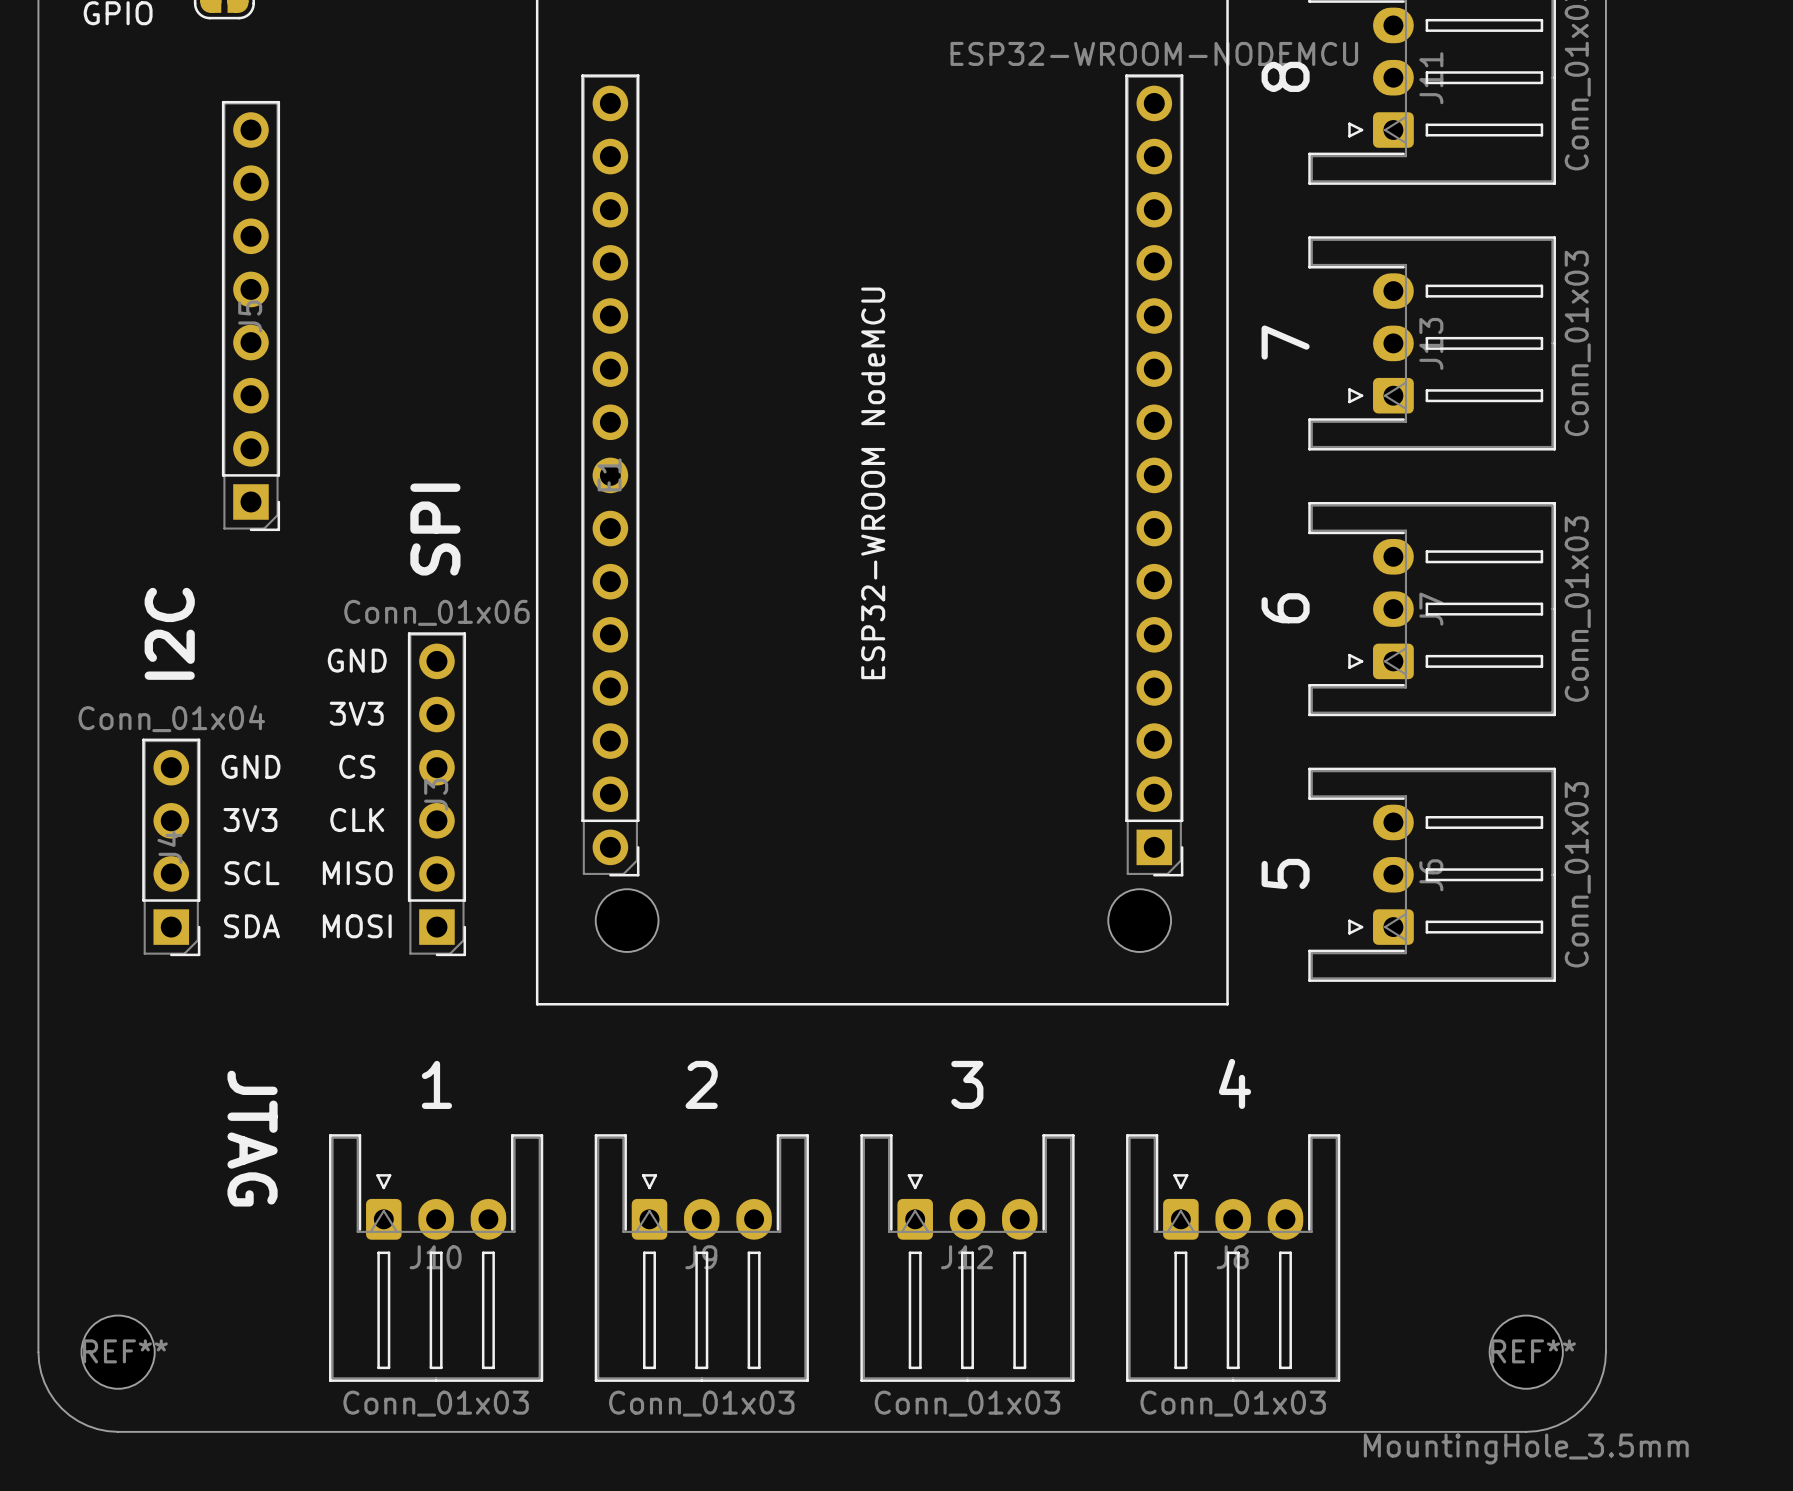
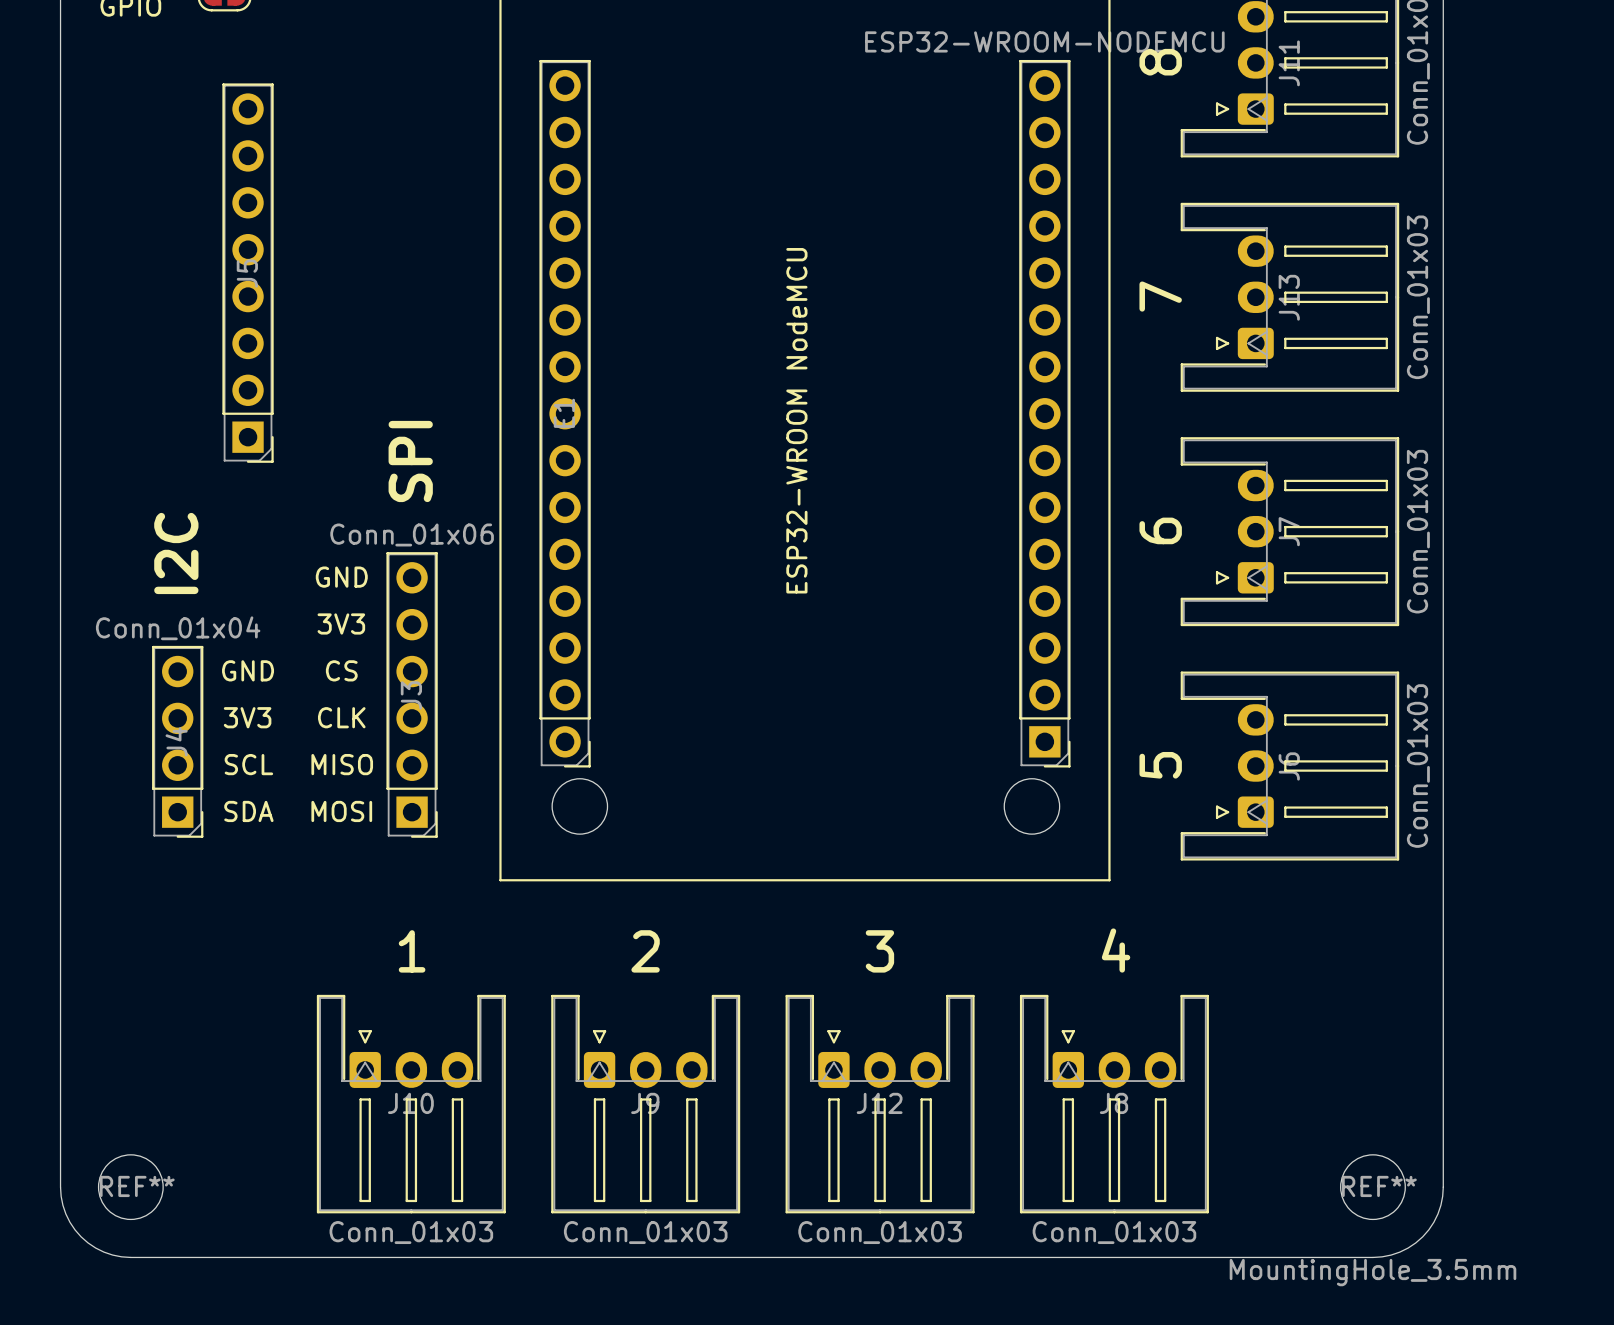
text: JTAG (252, 1138) -> none

